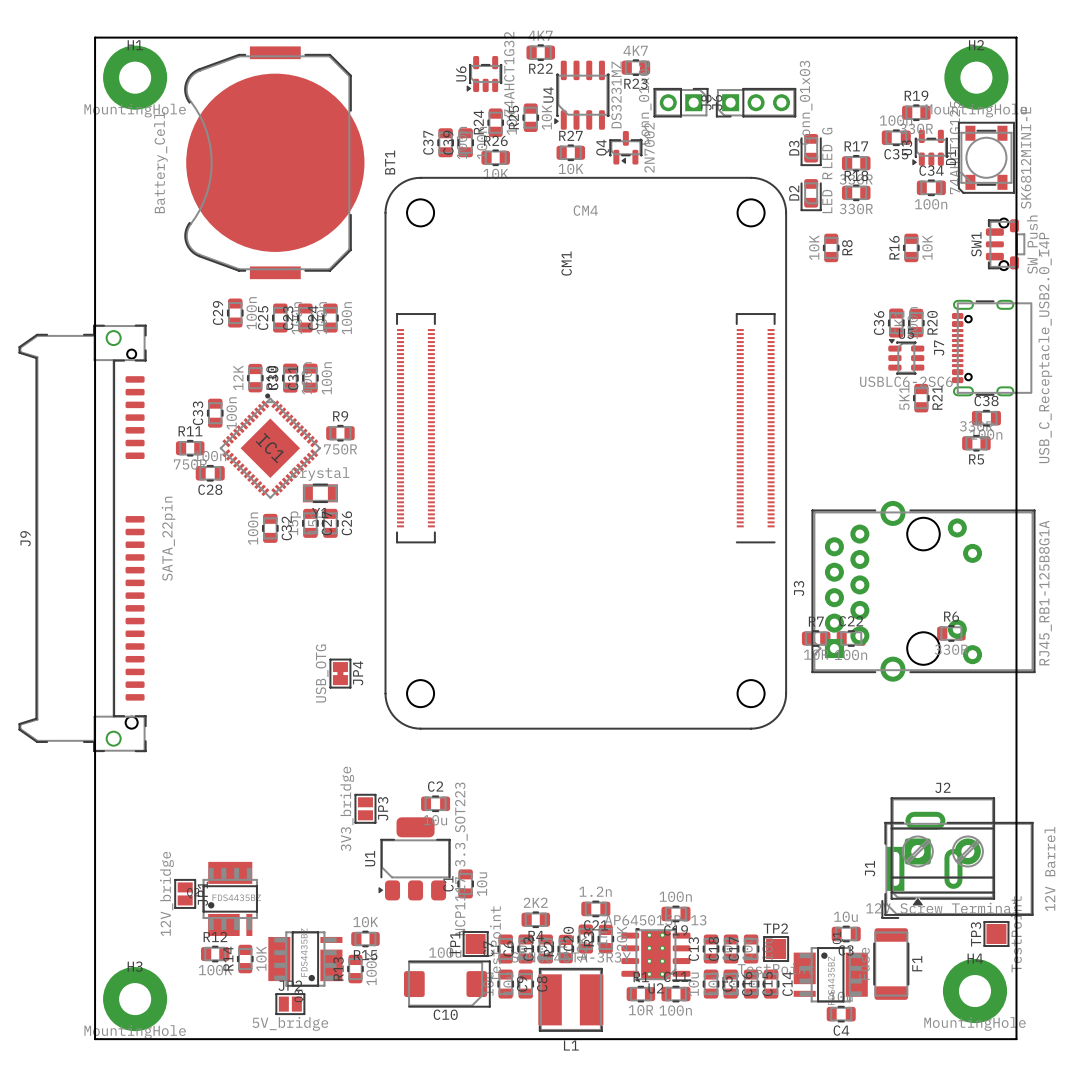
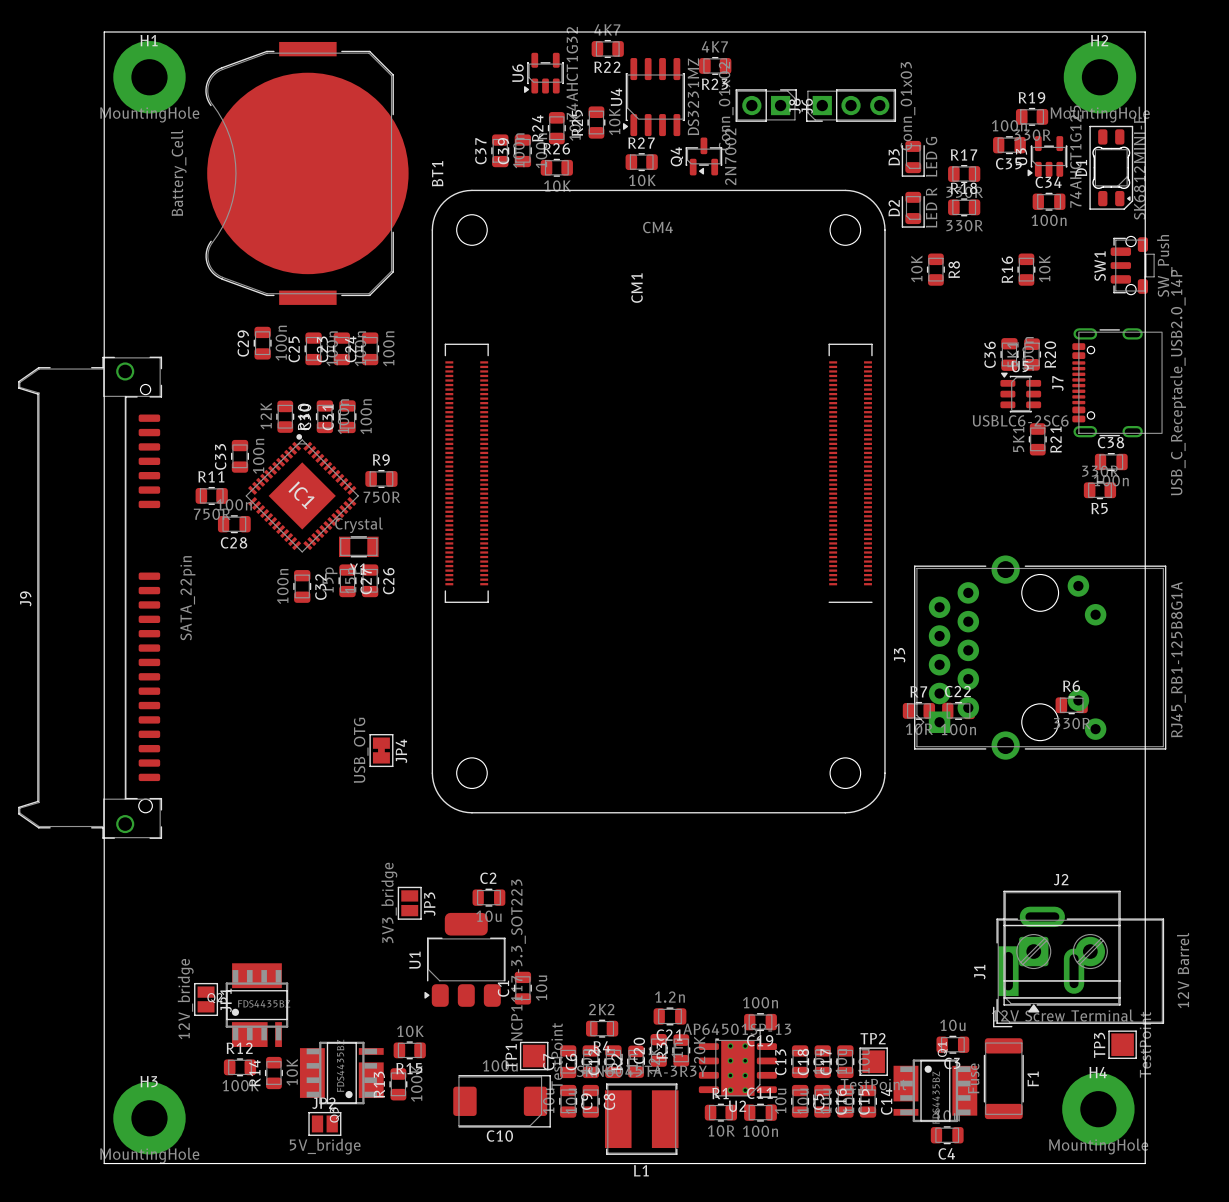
D1 footprint: [958, 122, 1015, 194] -> [1089, 125, 1134, 210]

